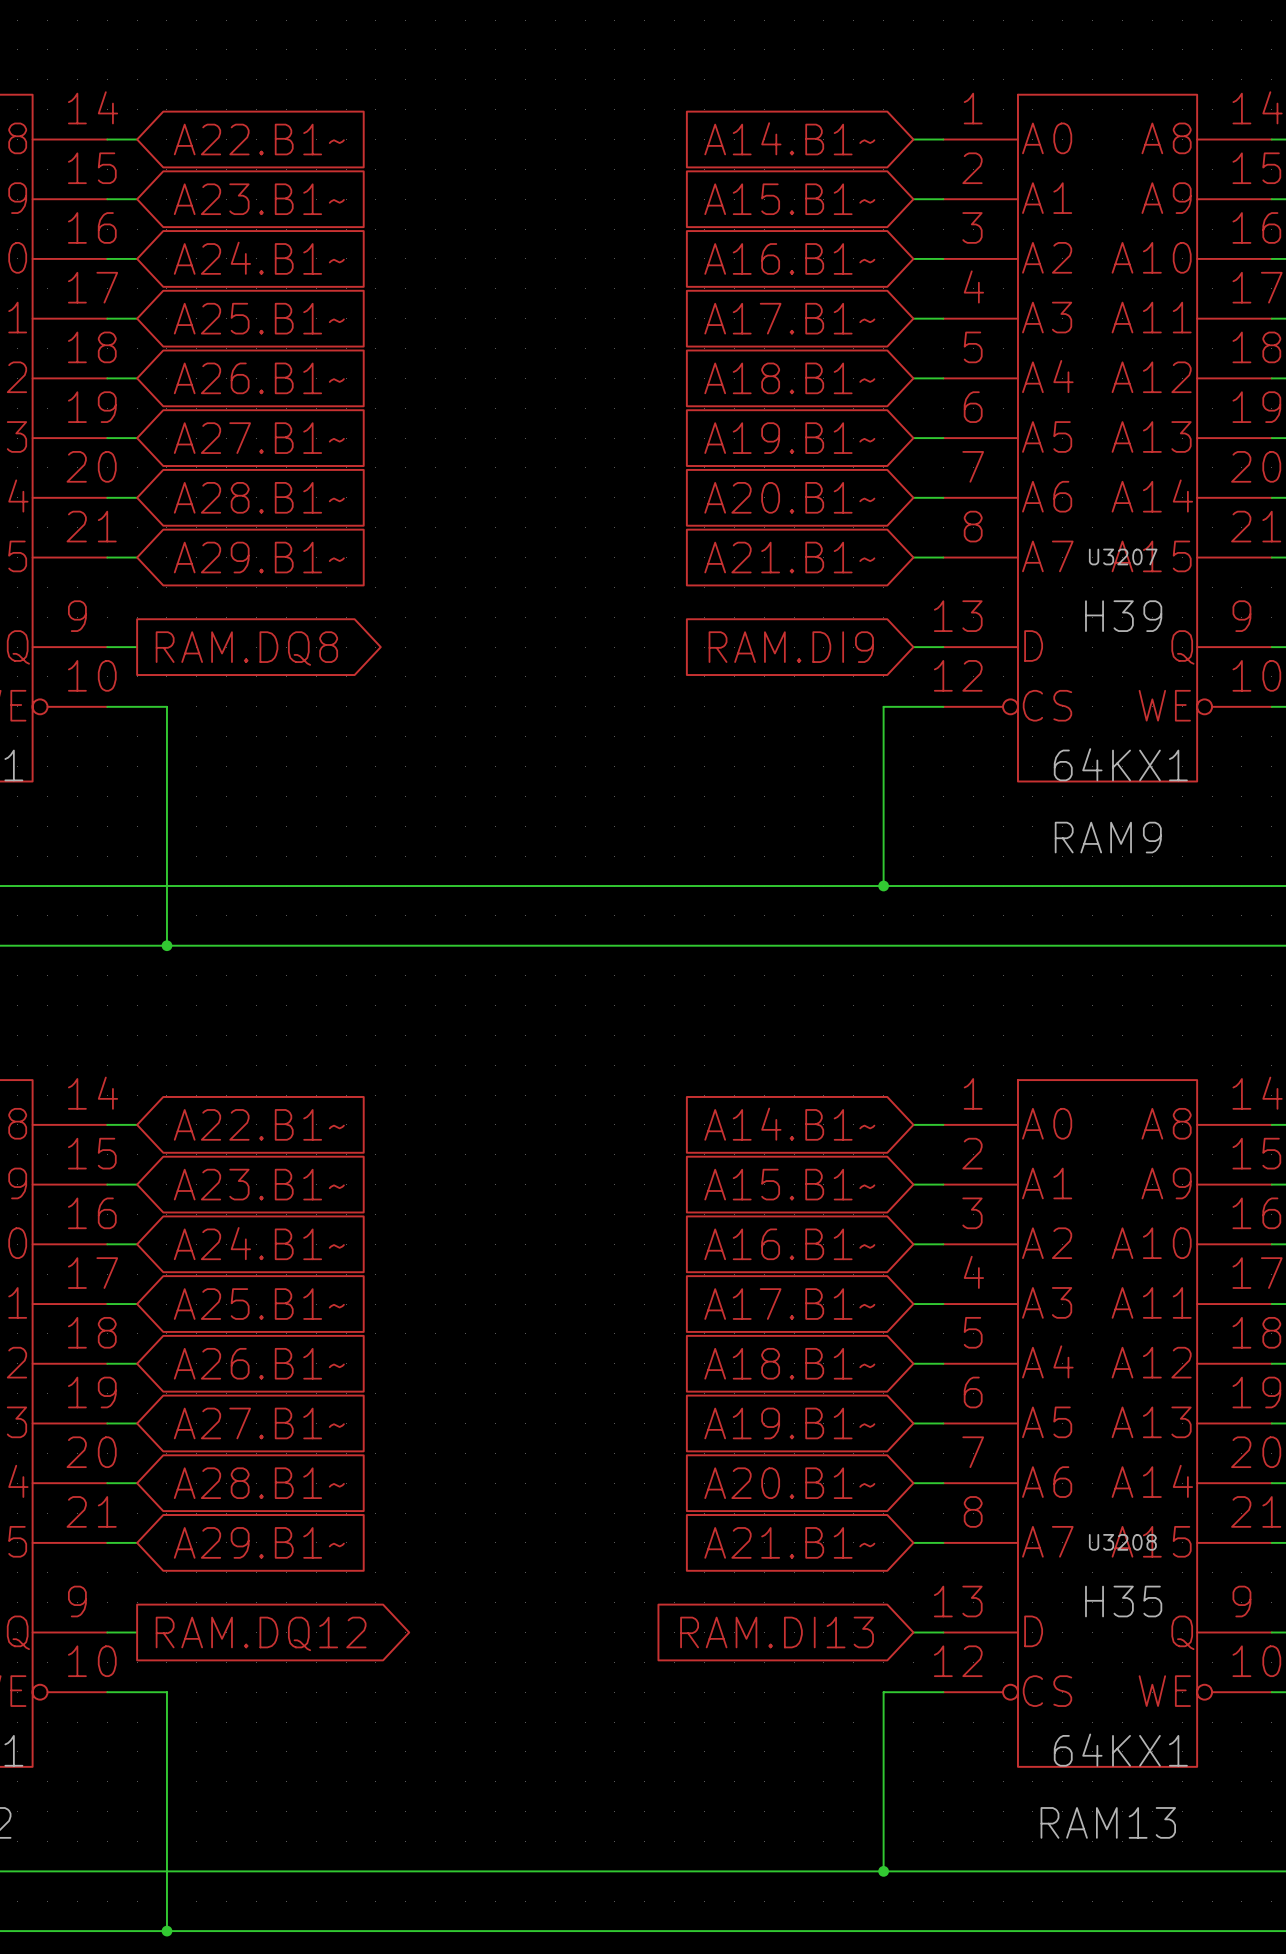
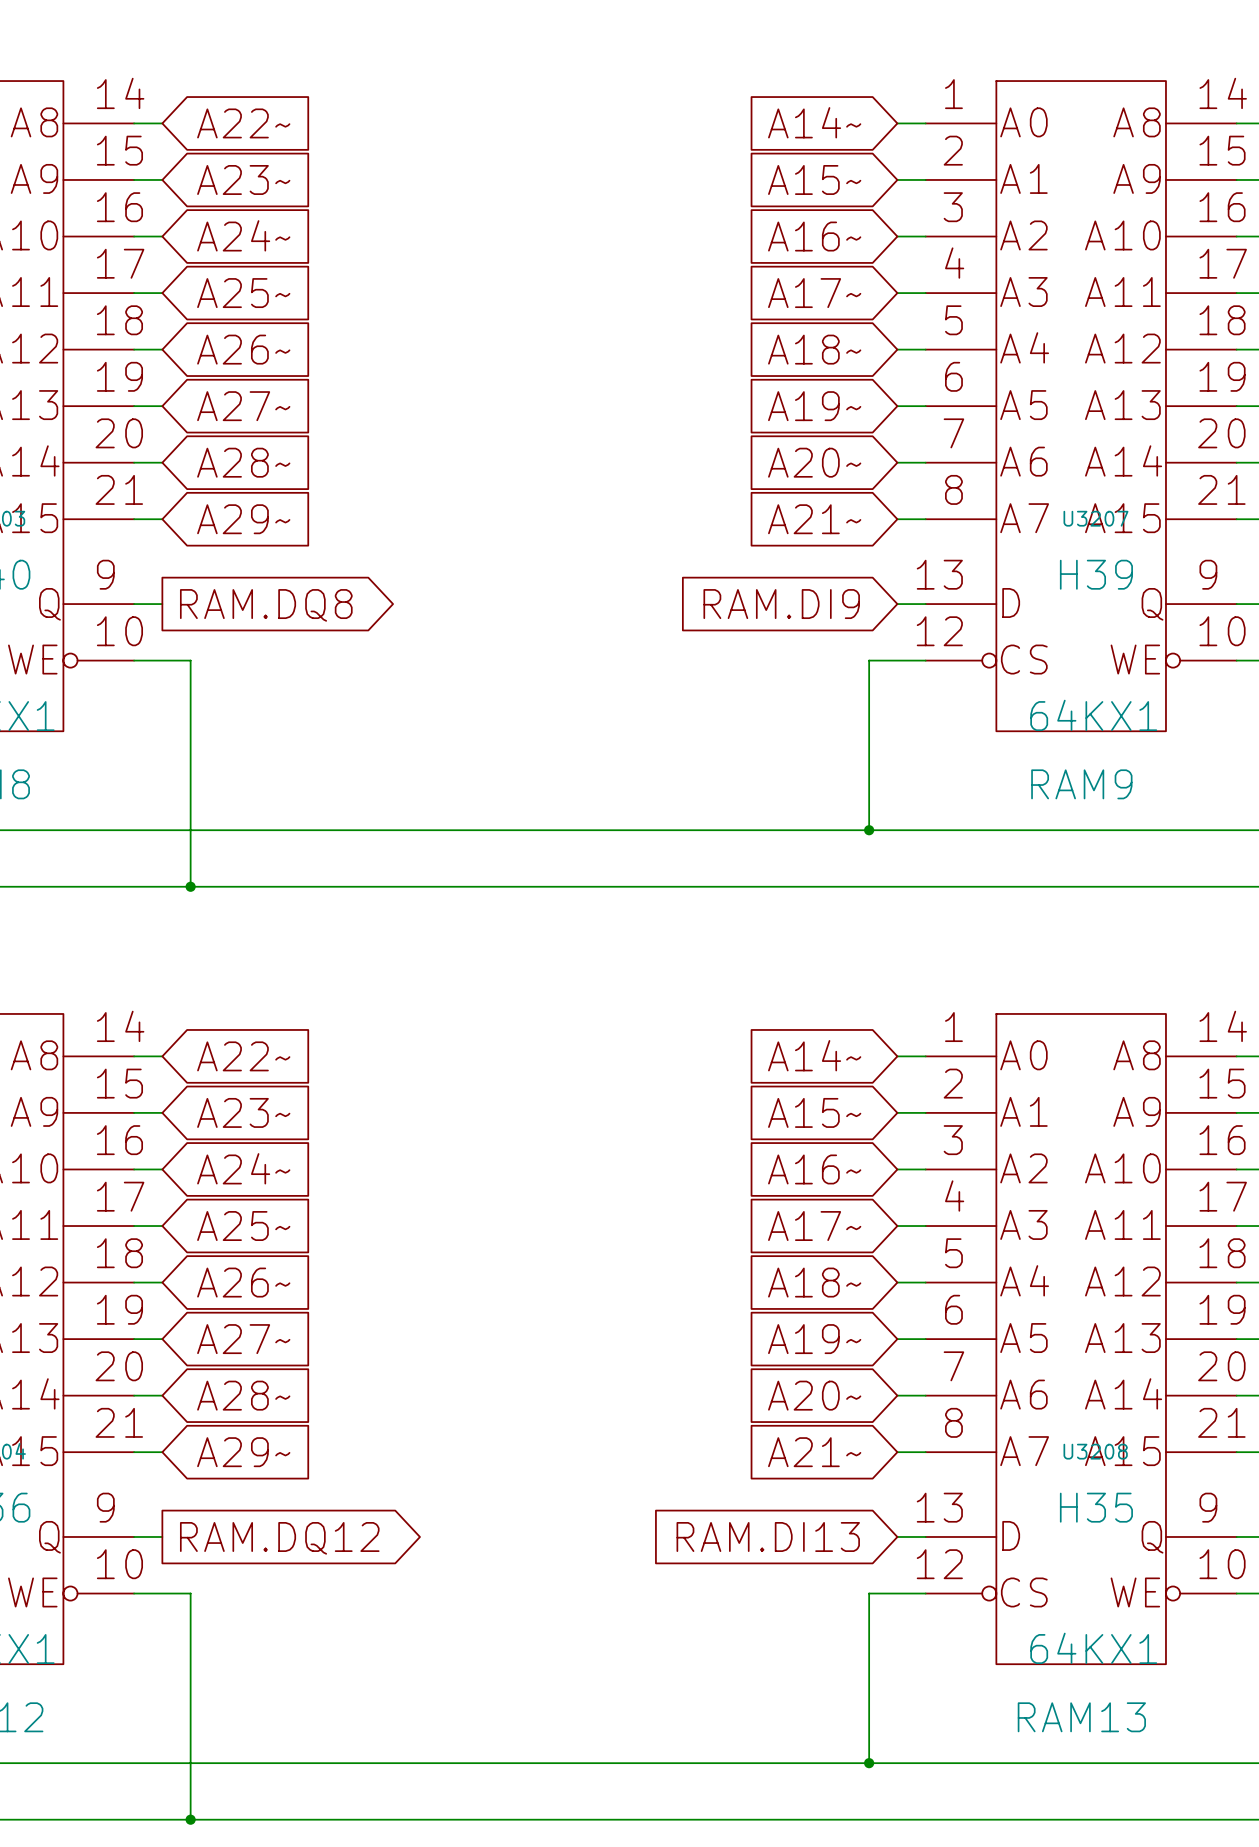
global label: A14.B1~ (789, 138) -> A14~ (814, 122)
global label: A22.B1~ (259, 139) -> A22~ (243, 123)
global label: A23.B1~ (259, 199) -> A23~ (243, 179)
global label: A15.B1~ (789, 199) -> A15~ (814, 179)
global label: A24.B1~ (259, 258) -> A24~ (243, 235)
global label: A16.B1~ (789, 258) -> A16~ (814, 236)
global label: A25.B1~ (259, 318) -> A25~ (243, 293)
global label: A17.B1~ (789, 318) -> A17~ (814, 293)
global label: A26.B1~ (259, 378) -> A26~ (243, 349)
global label: A18.B1~ (789, 378) -> A18~ (814, 349)
global label: A27.B1~ (259, 438) -> A27~ (243, 406)
global label: A19.B1~ (789, 438) -> A19~ (814, 406)
global label: A28.B1~ (259, 497) -> A28~ (243, 462)
global label: A20.B1~ (789, 497) -> A20~ (814, 462)
global label: A29.B1~ (259, 557) -> A29~ (243, 519)
global label: A21.B1~ (789, 557) -> A21~ (814, 519)
global label: A22.B1~ (259, 1124) -> A22~ (243, 1056)
global label: A14.B1~ (789, 1124) -> A14~ (814, 1055)
global label: A23.B1~ (259, 1184) -> A23~ (243, 1112)
global label: A15.B1~ (789, 1184) -> A15~ (814, 1112)
global label: A24.B1~ (259, 1243) -> A24~ (243, 1168)
global label: A16.B1~ (789, 1244) -> A16~ (814, 1169)
global label: A25.B1~ (259, 1304) -> A25~ (243, 1226)
global label: A17.B1~ (789, 1304) -> A17~ (814, 1226)
global label: A26.B1~ (259, 1363) -> A26~ (243, 1282)
global label: A18.B1~ (789, 1363) -> A18~ (814, 1282)
global label: A27.B1~ (259, 1423) -> A27~ (243, 1339)
global label: A19.B1~ (789, 1423) -> A19~ (814, 1339)
global label: A28.B1~ (259, 1483) -> A28~ (243, 1395)
global label: A20.B1~ (789, 1483) -> A20~ (814, 1395)
global label: A29.B1~ (259, 1542) -> A29~ (243, 1452)
global label: A21.B1~ (789, 1542) -> A21~ (814, 1452)

